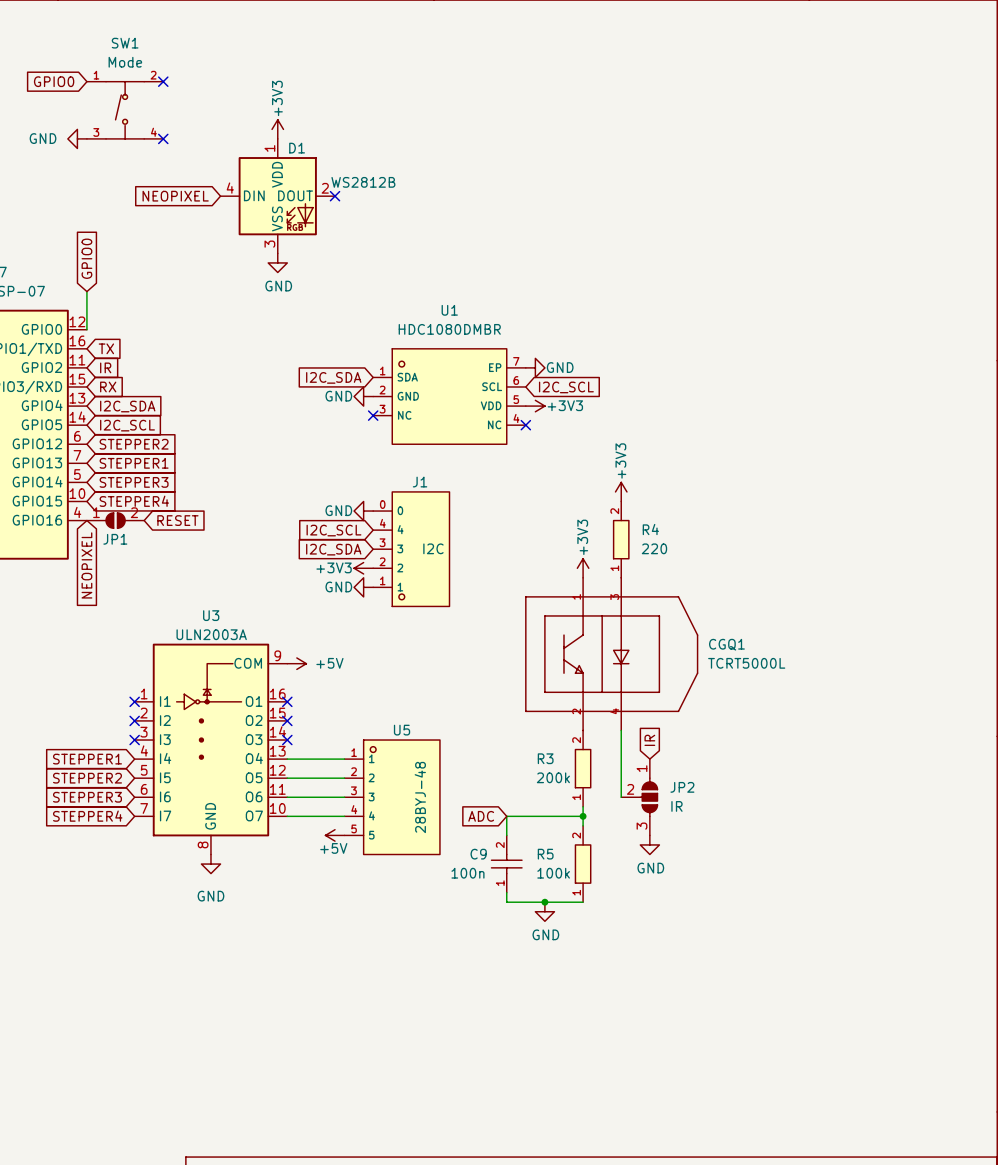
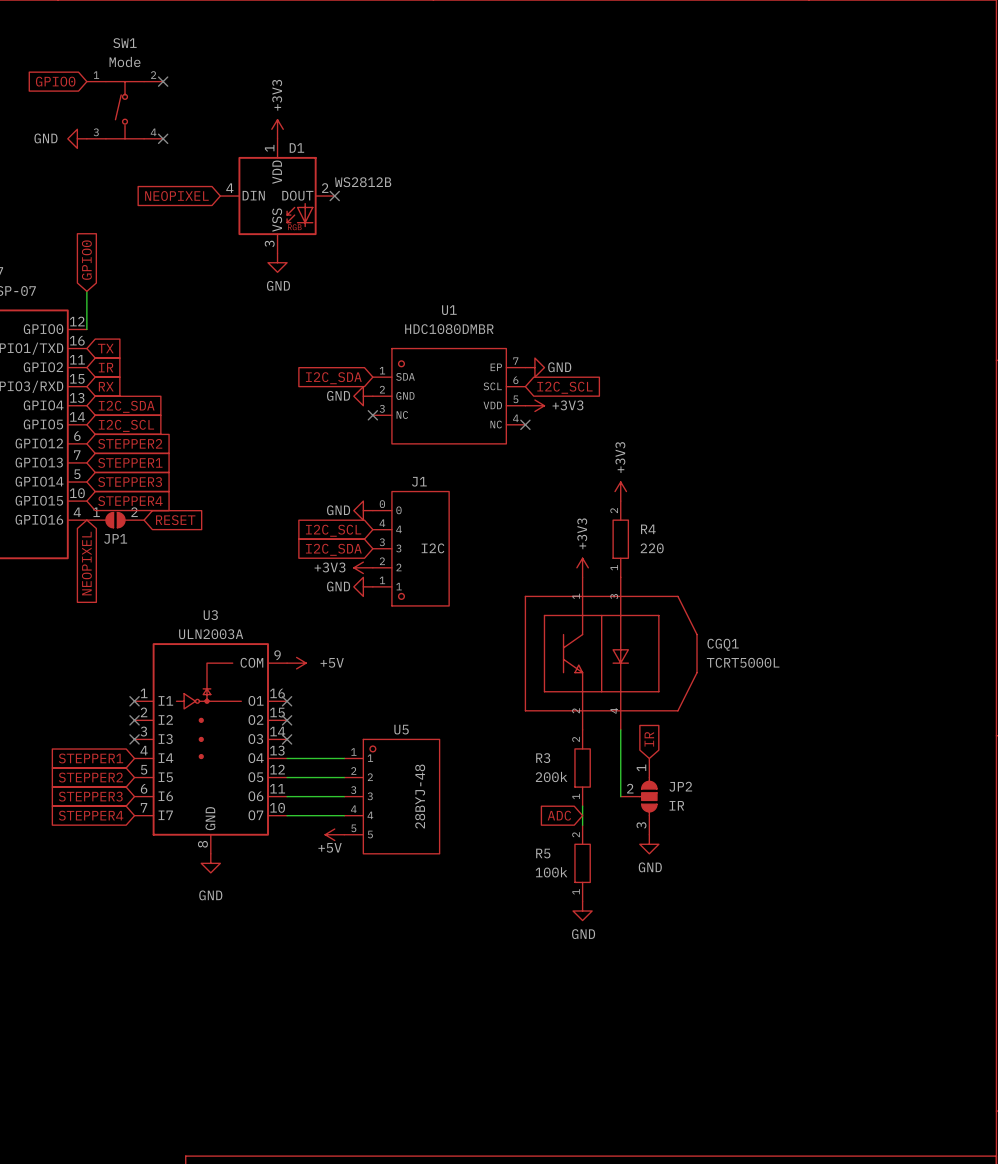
global label position: ADC (481, 816) -> ADC (559, 815)
wire: (583, 816) (506, 816) (506, 835) -> none
junction: (583, 816) -> none
C9: 100n (506, 864) -> none
wire: (506, 892) (506, 902) (583, 902) -> none
junction: (544, 902) -> none
power symbol position: GND (544, 911) -> GND (582, 911)

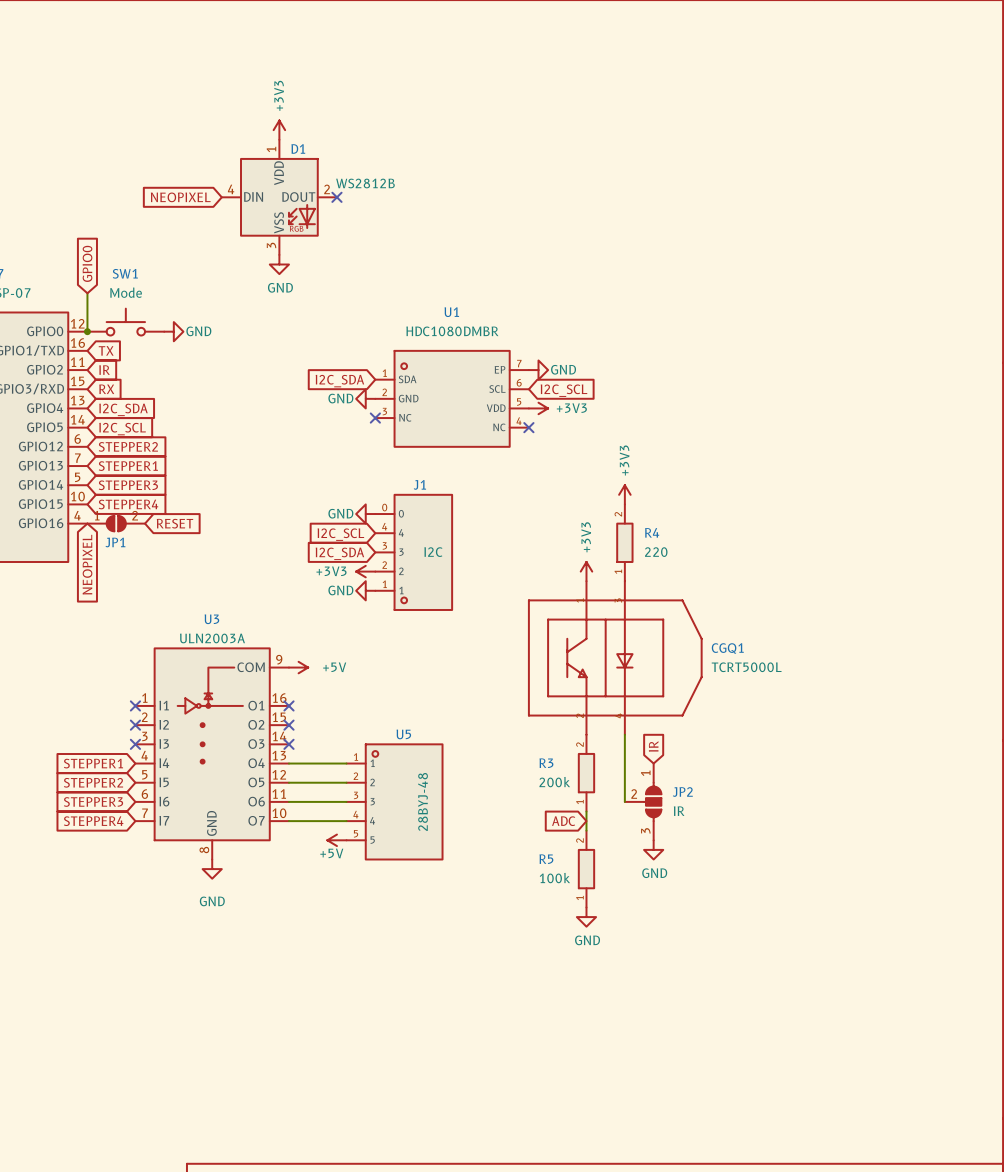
SW1 name position: SW1 (124, 43) -> SW1 (125, 273)
SW1 value position: Mode (125, 61) -> Mode (126, 292)
global label: GPIO0 (55, 81) -> none
SW1 symbol: [86, 81, 164, 139] -> [87, 308, 165, 336]
no-connect mark: (163, 81) -> none
power symbol: GND (77, 138) -> none
no-connect mark: (163, 138) -> none
junction: none -> (87, 331)
power symbol: none -> GND (173, 331)

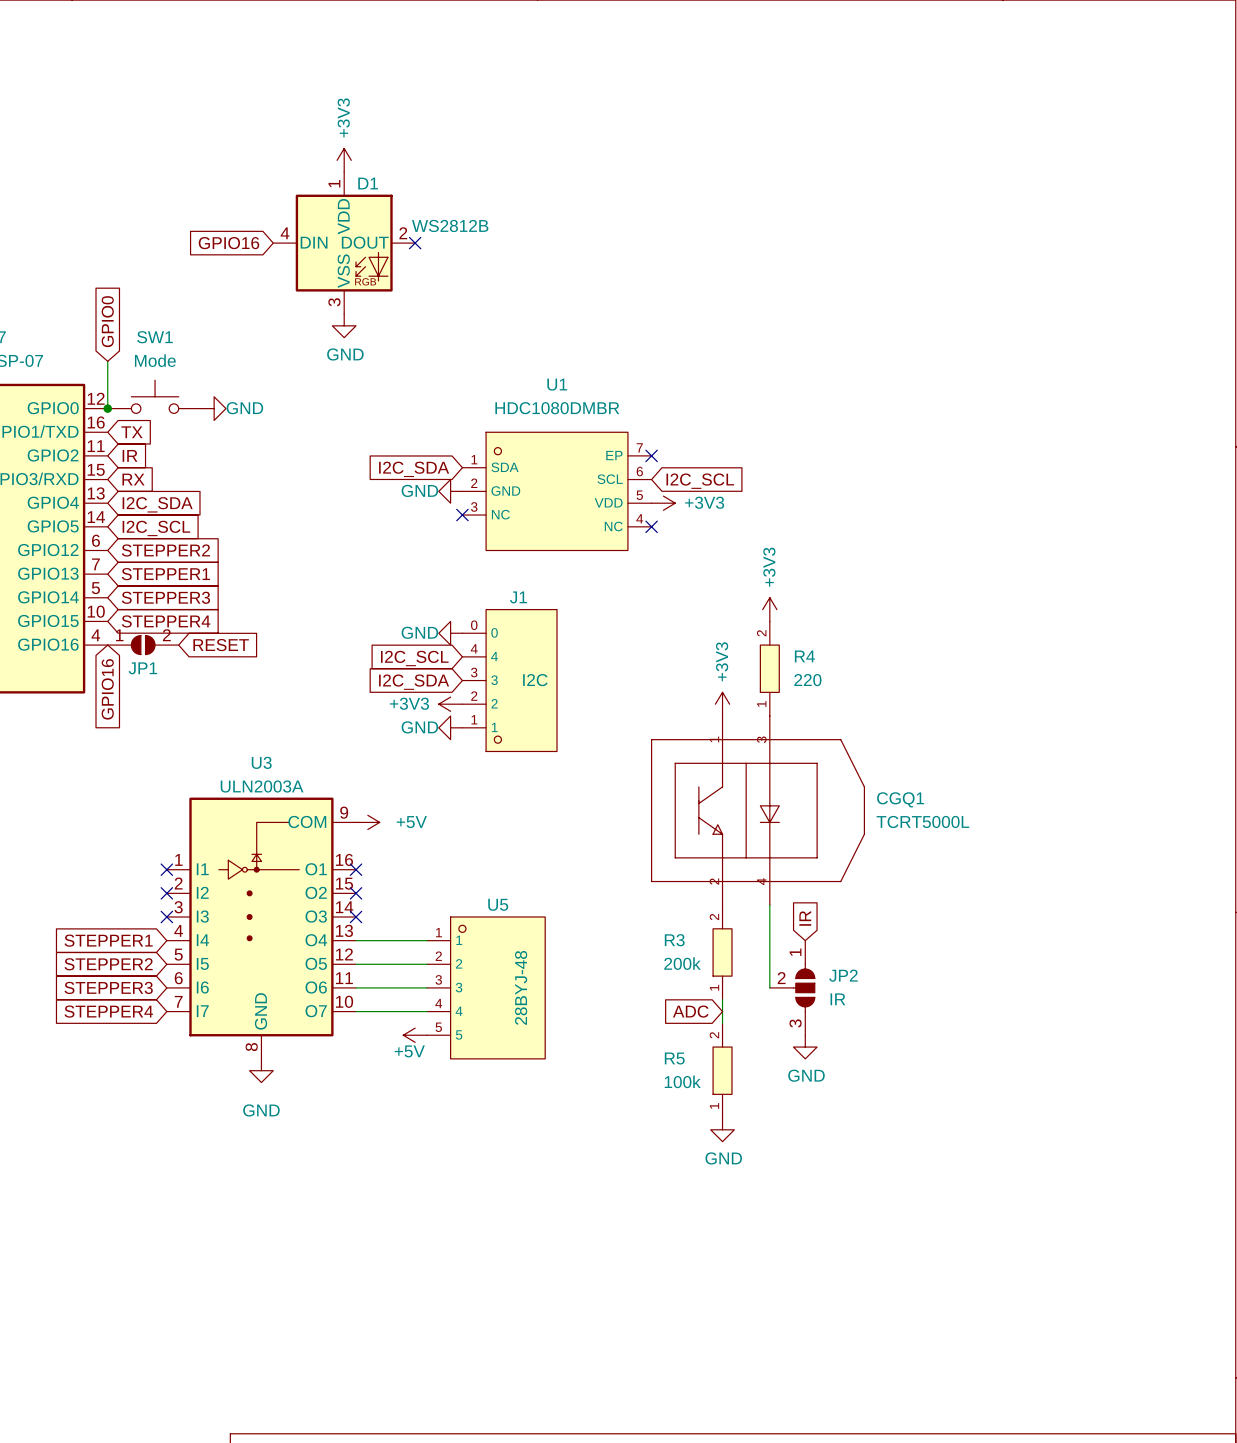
global label: NEOPIXEL (180, 197) -> GPIO16 (228, 243)
no-connect mark: none -> (651, 455)
power symbol: GND (538, 370) -> none
global label: NEOPIXEL (87, 564) -> GPIO16 (107, 689)

